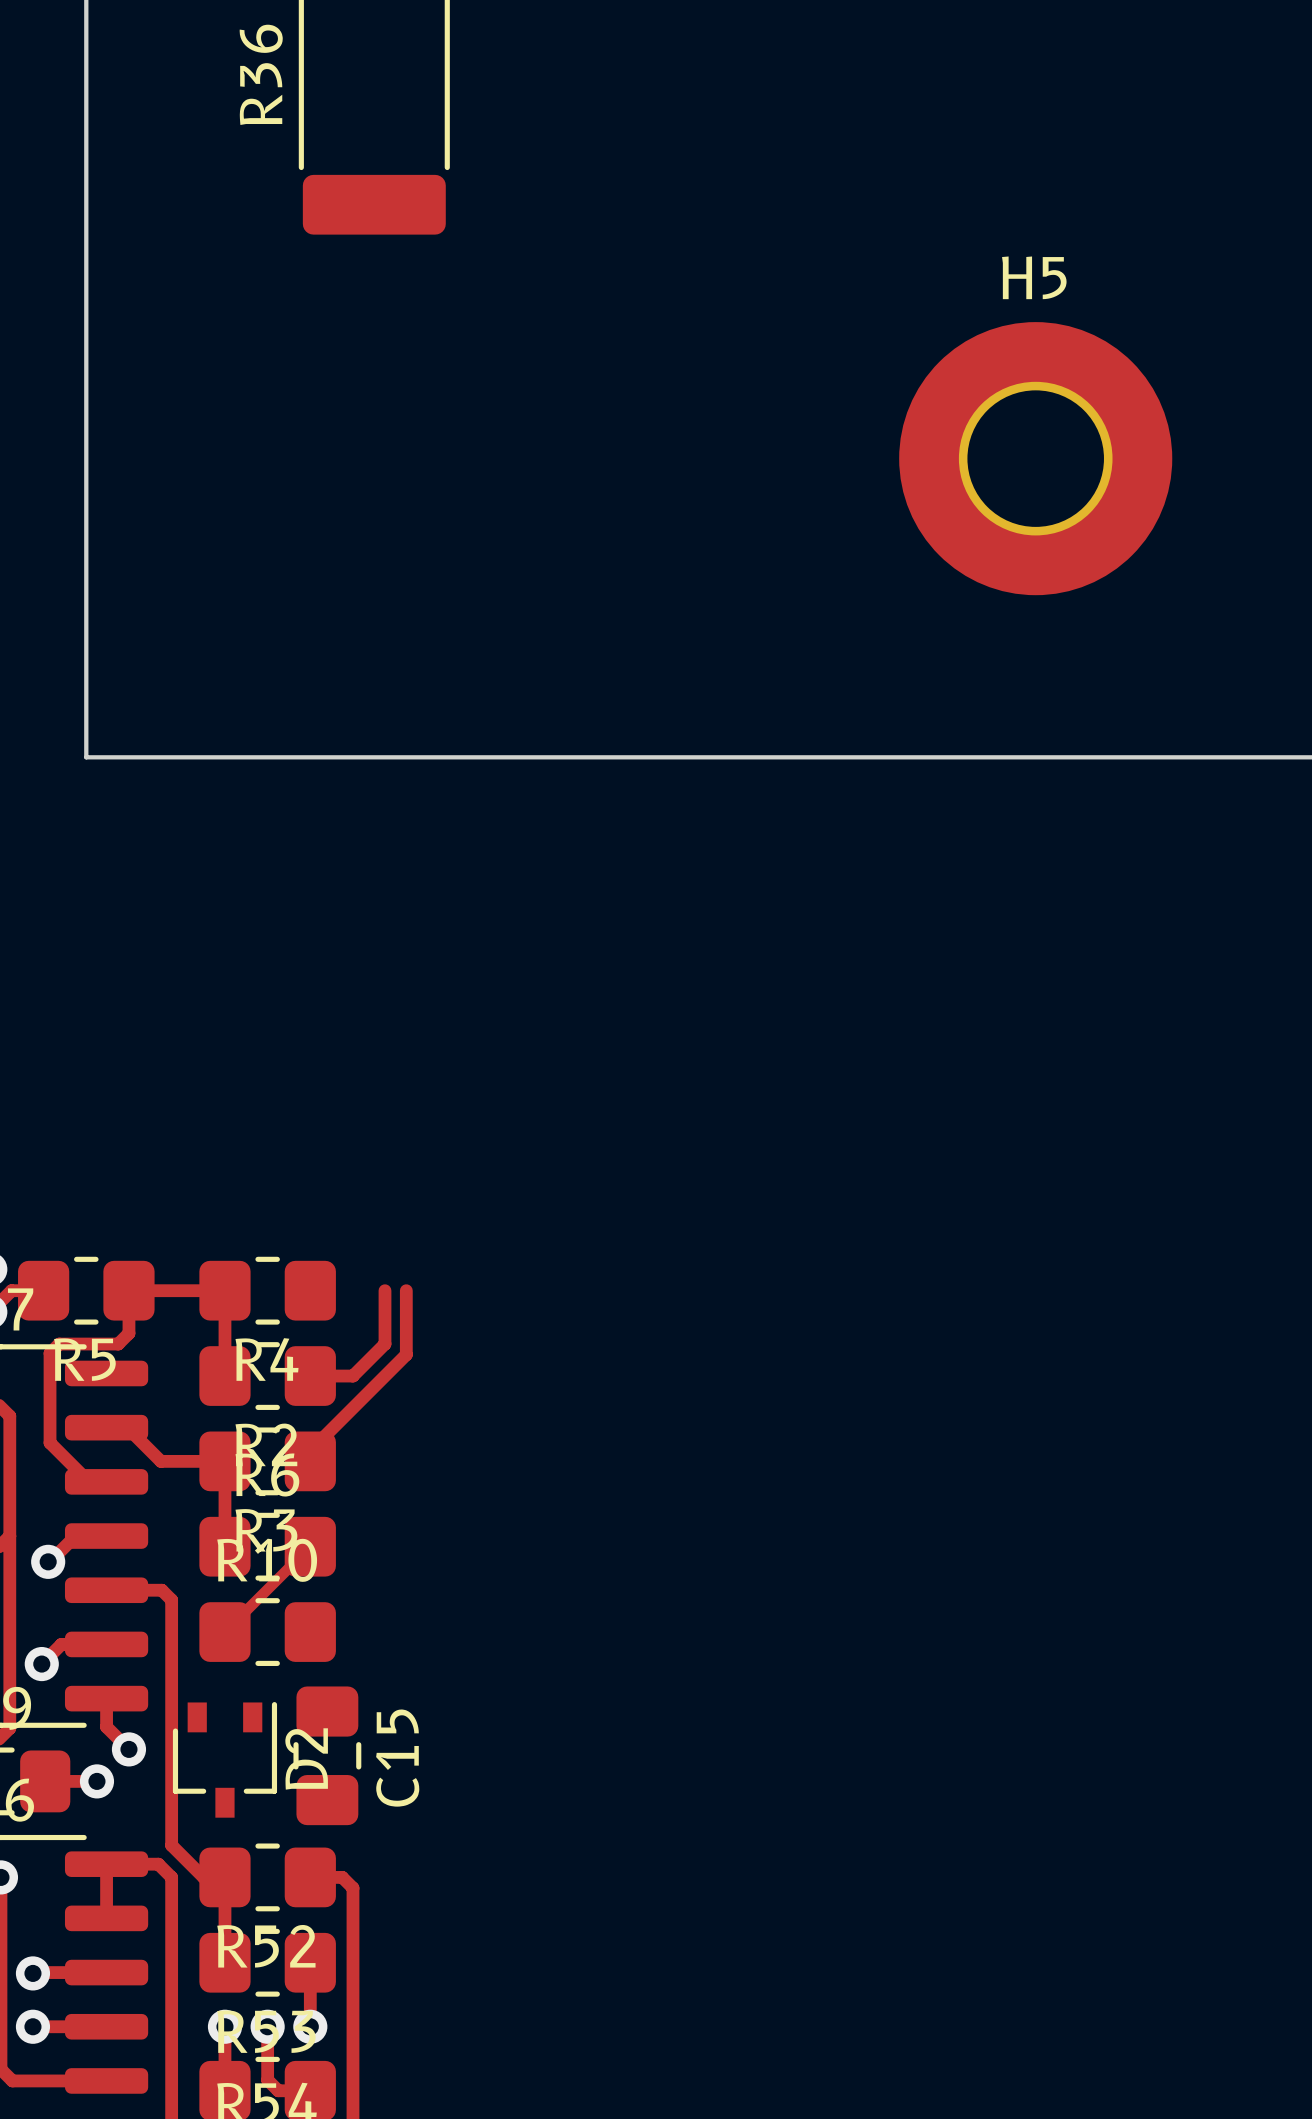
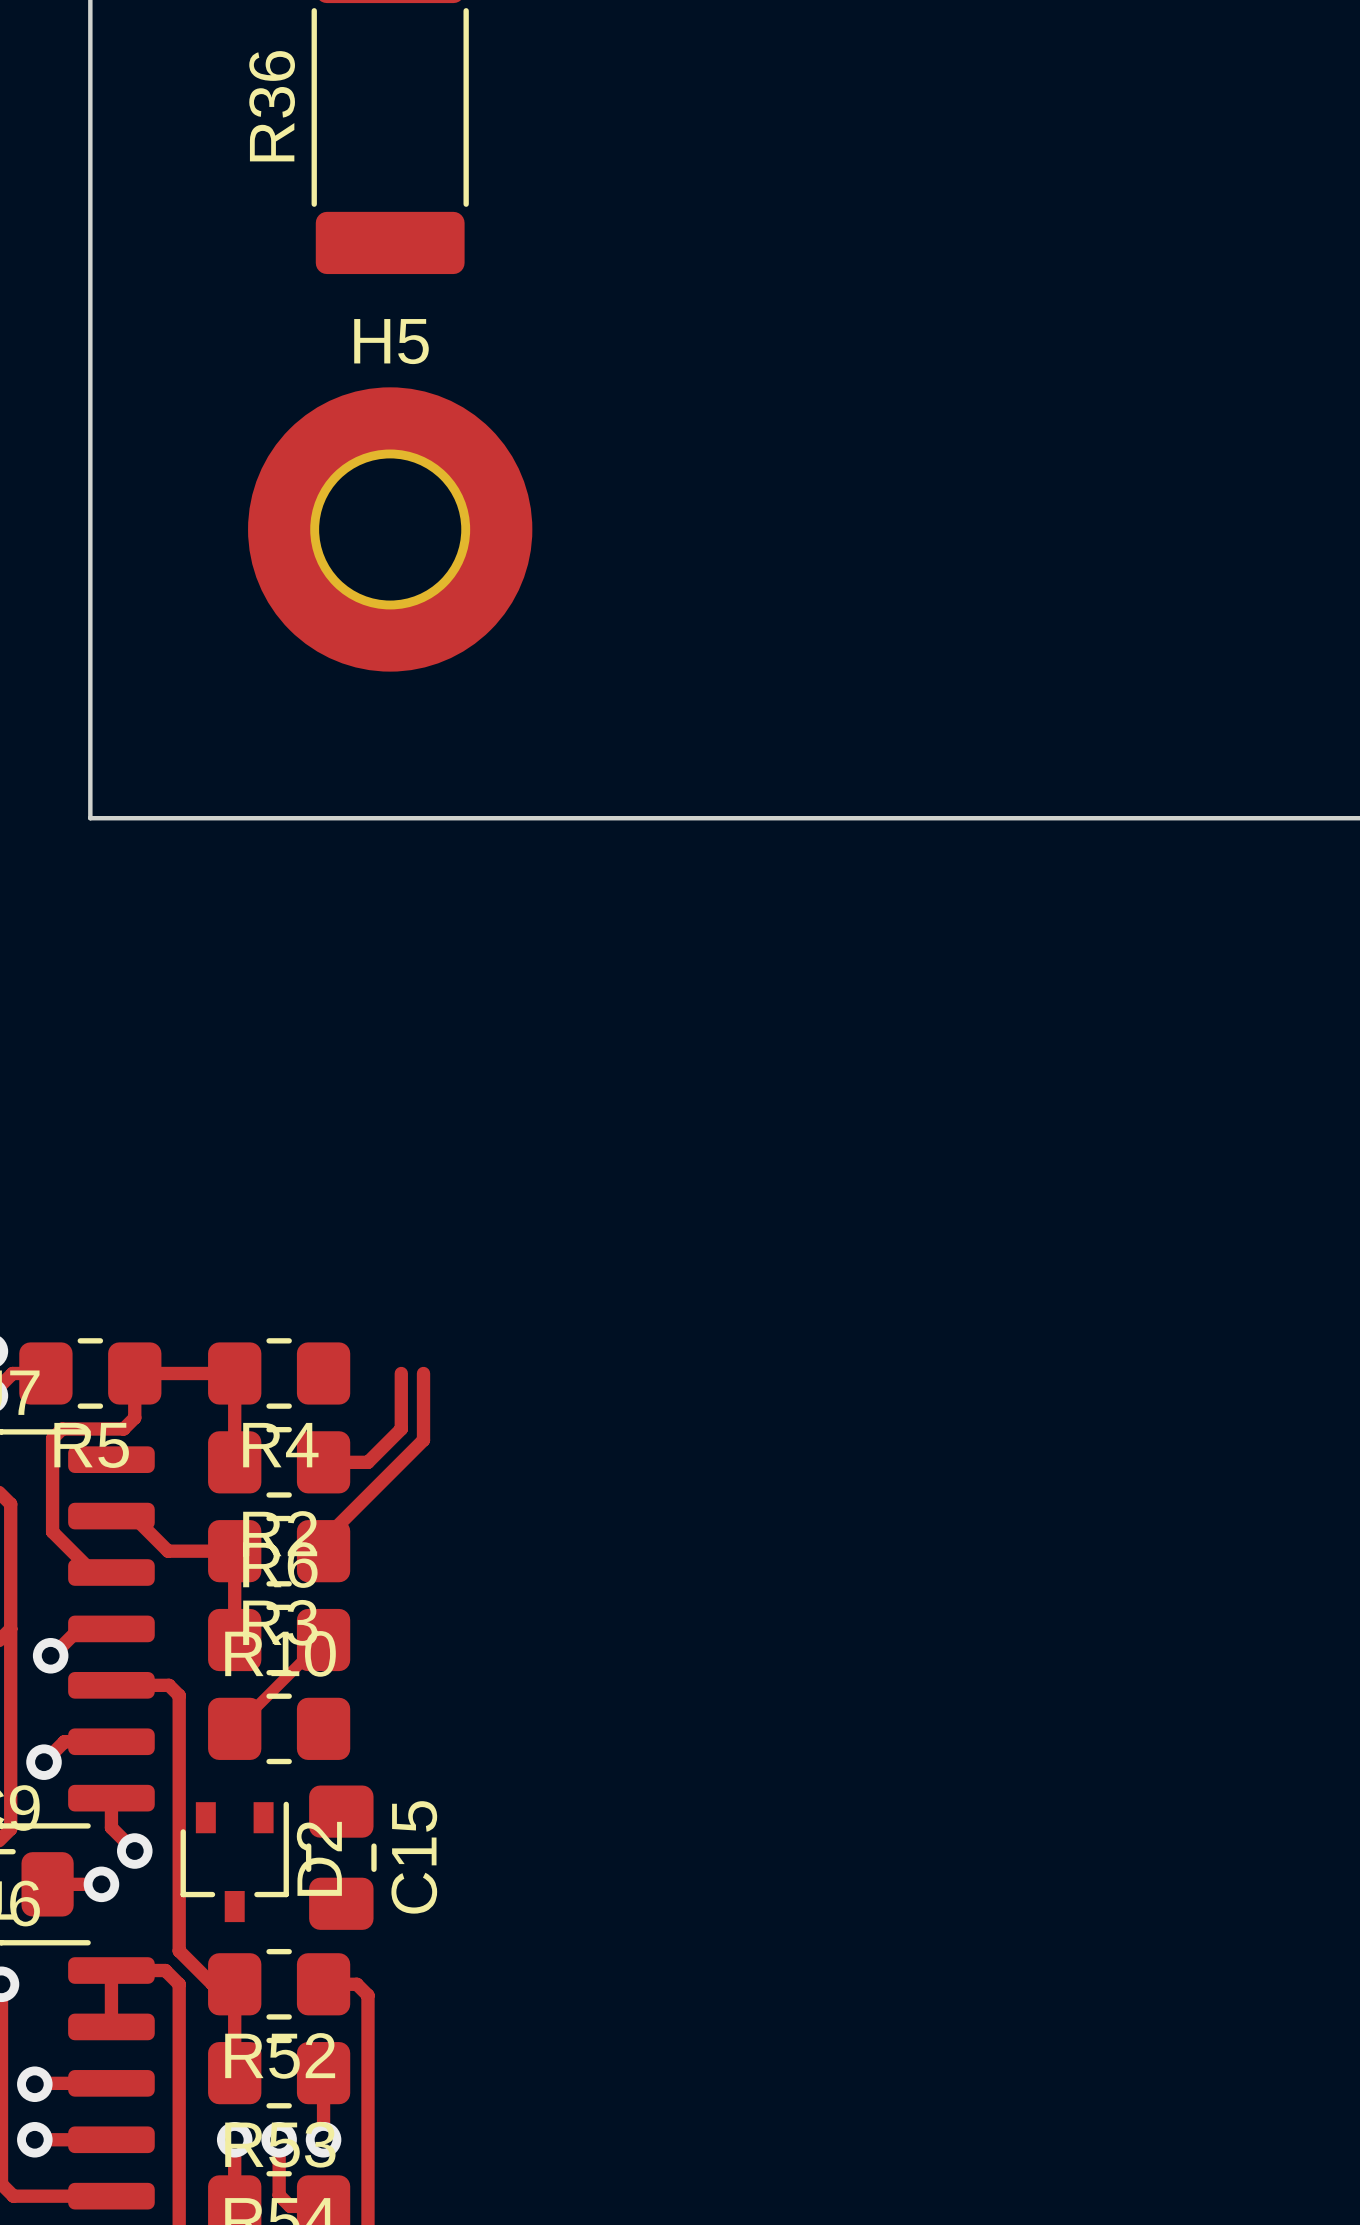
H5 position: (1035, 458) -> (390, 529)

